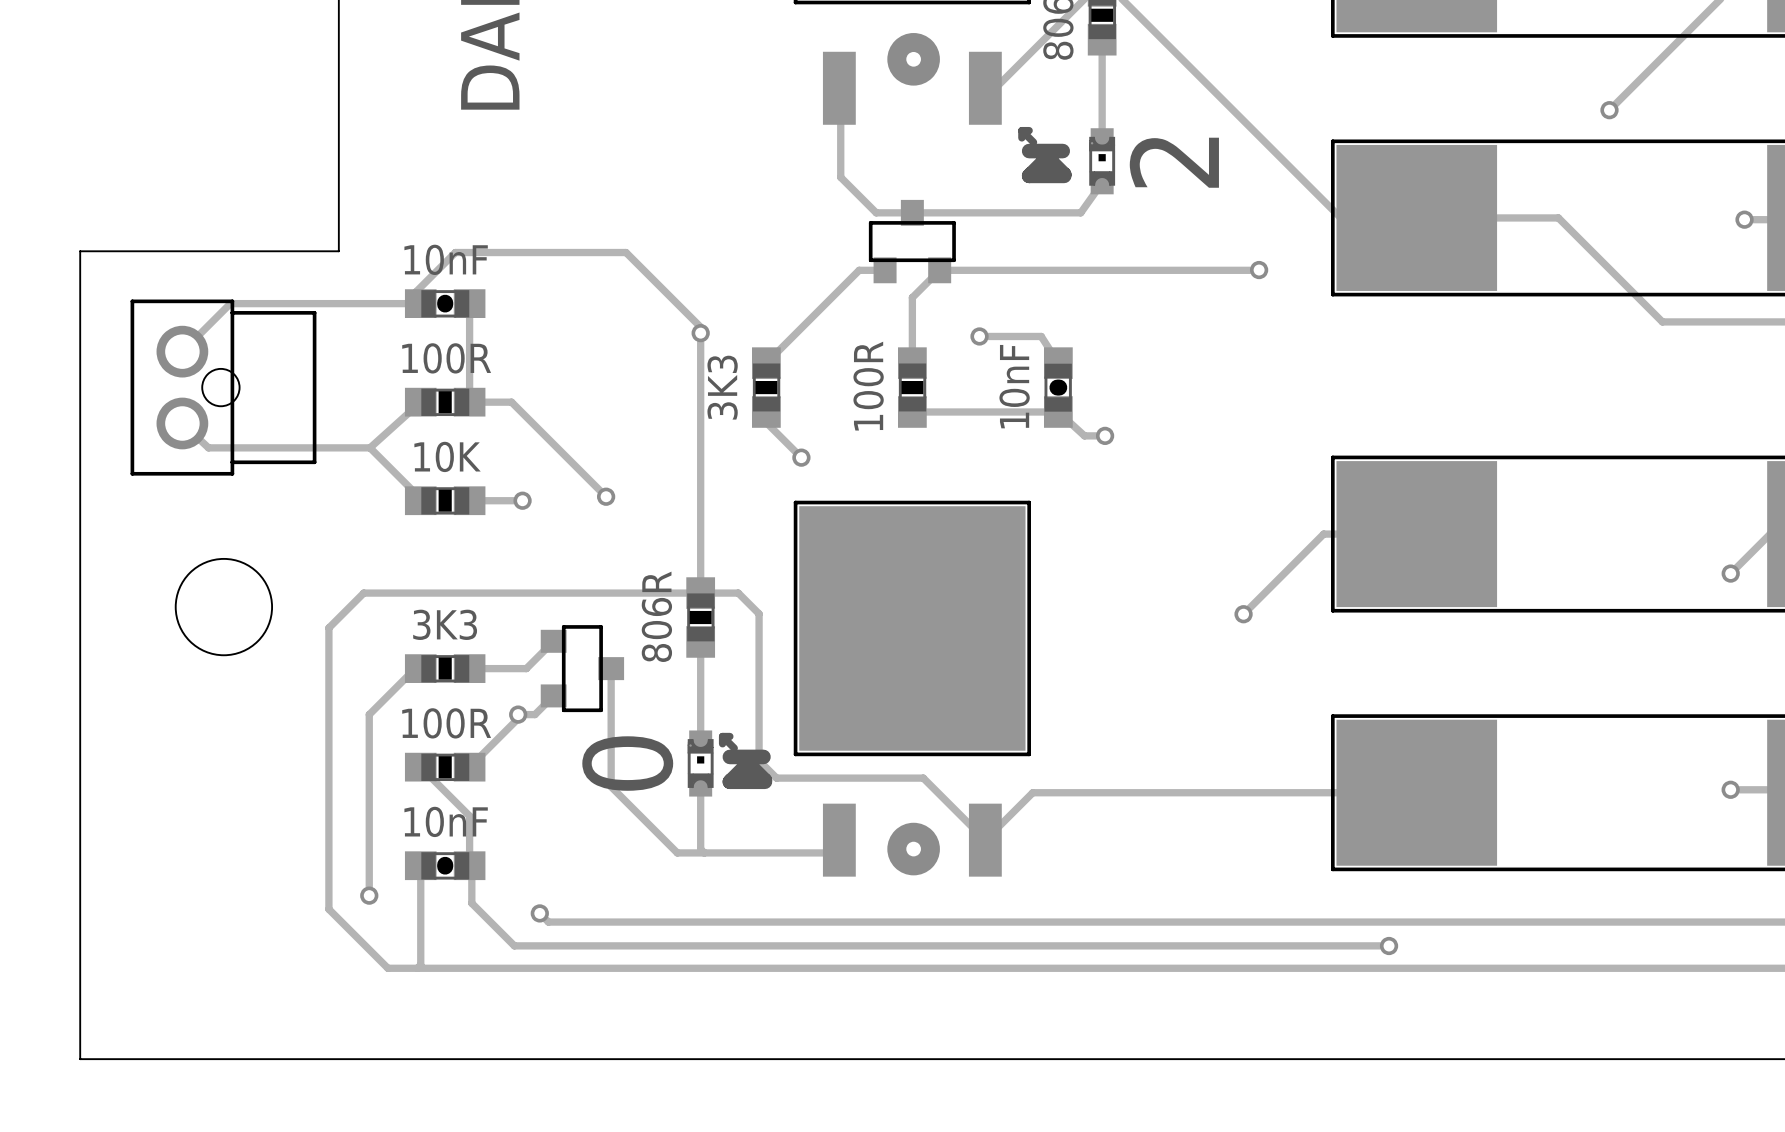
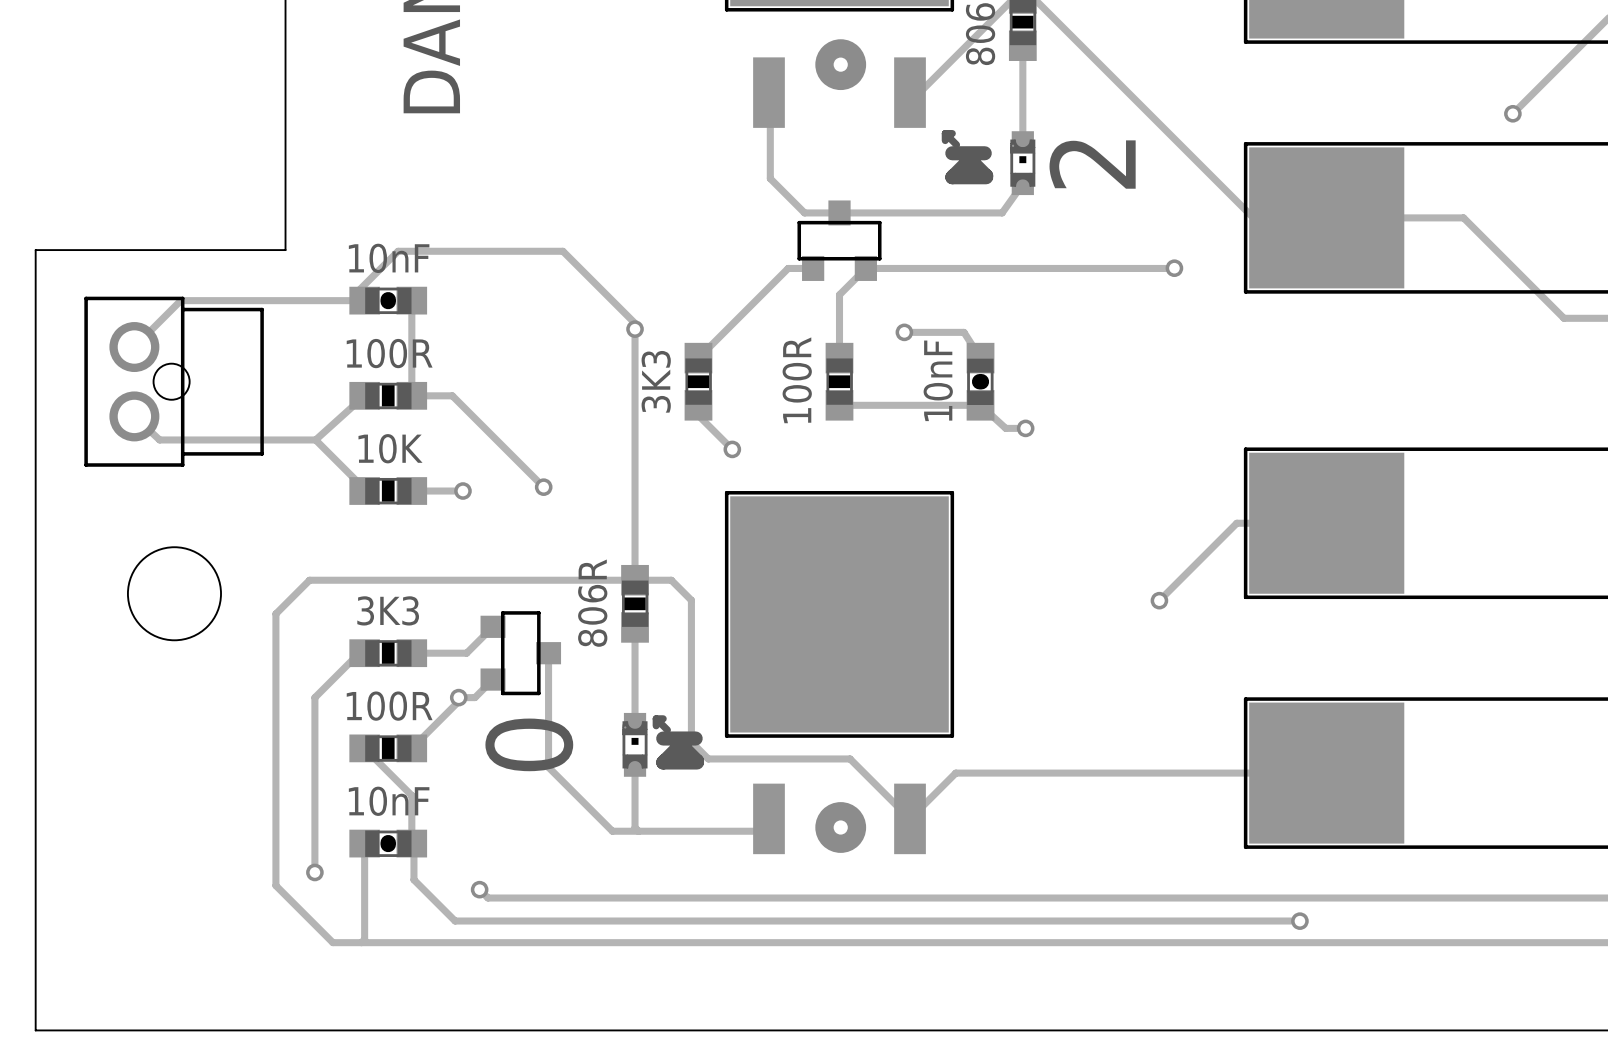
text position: 0 (627, 763) -> 0 (529, 744)

